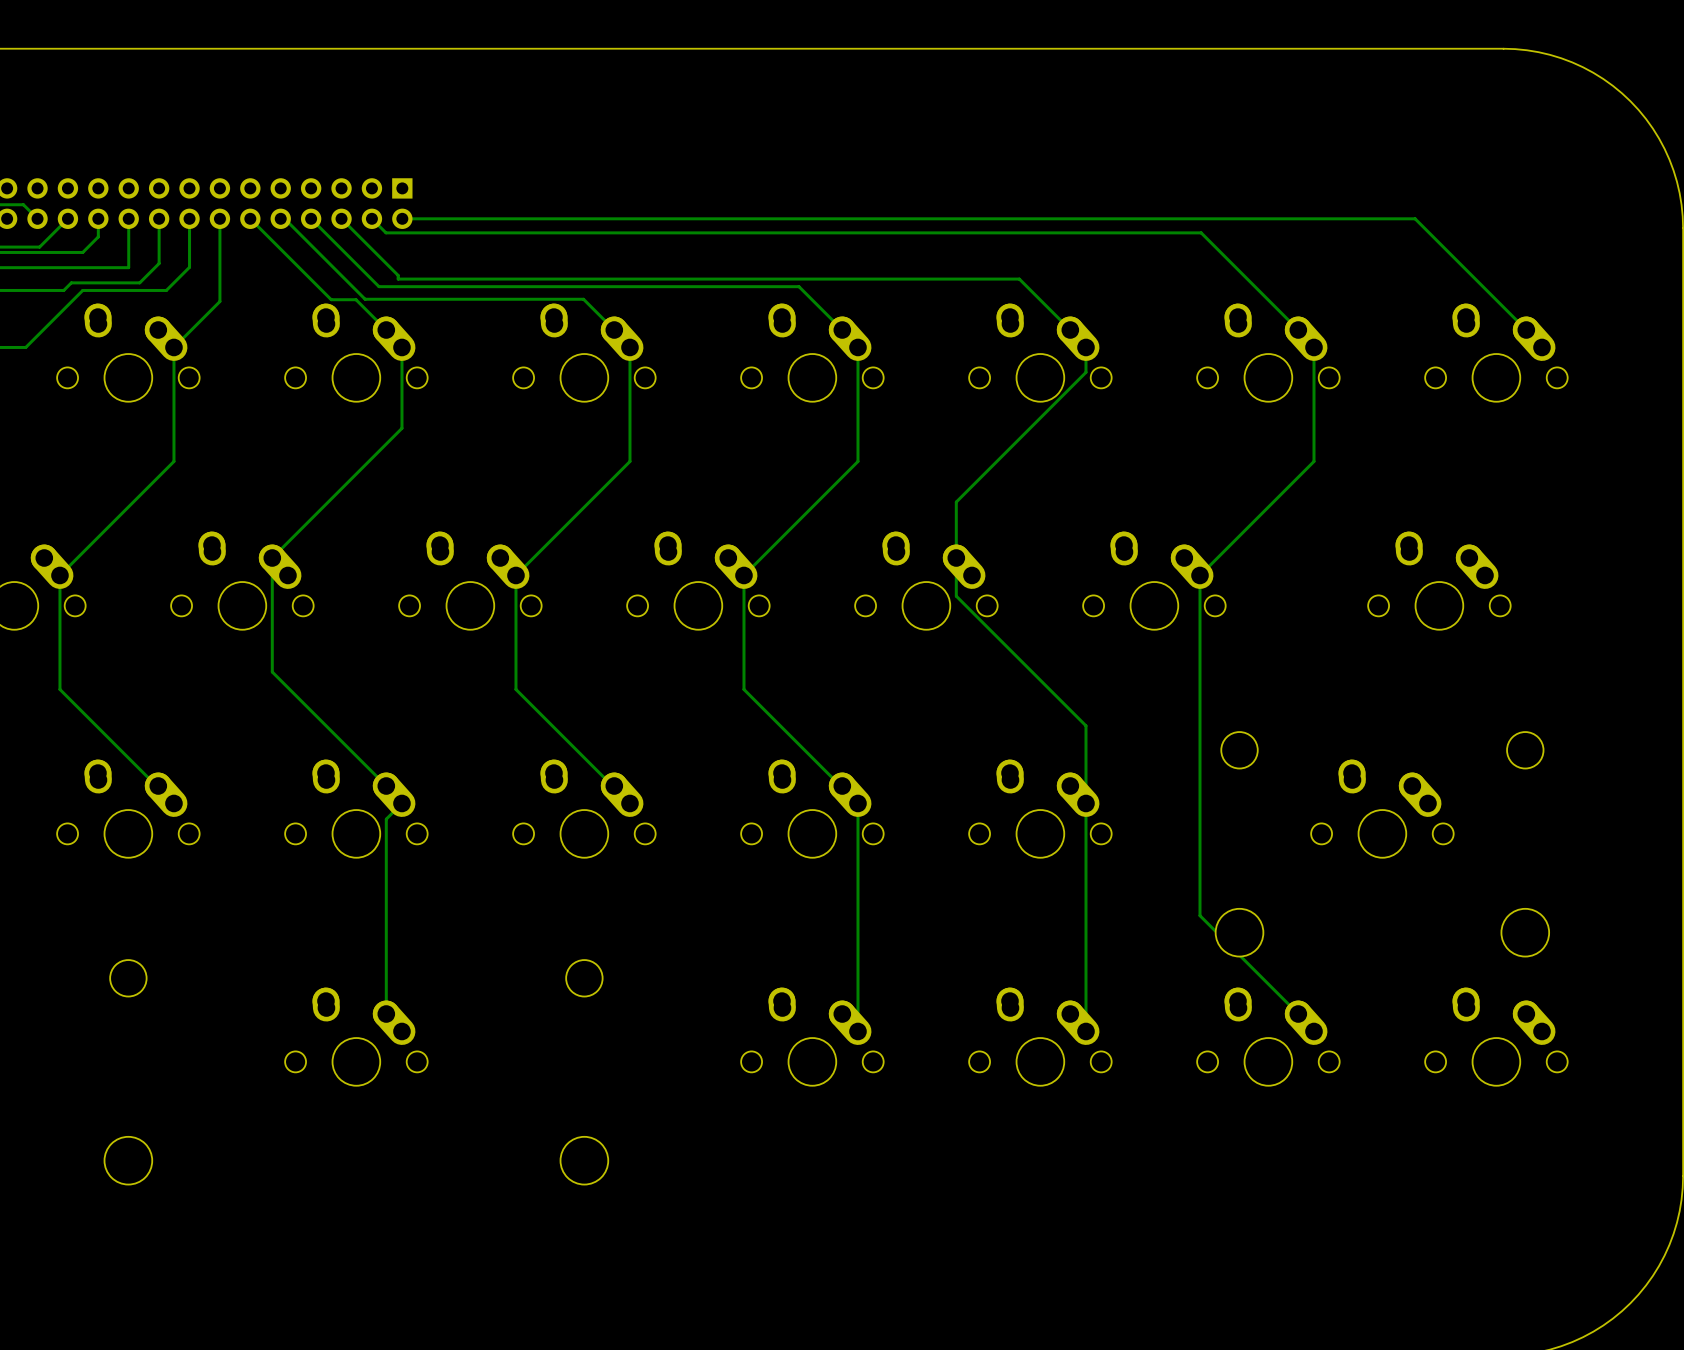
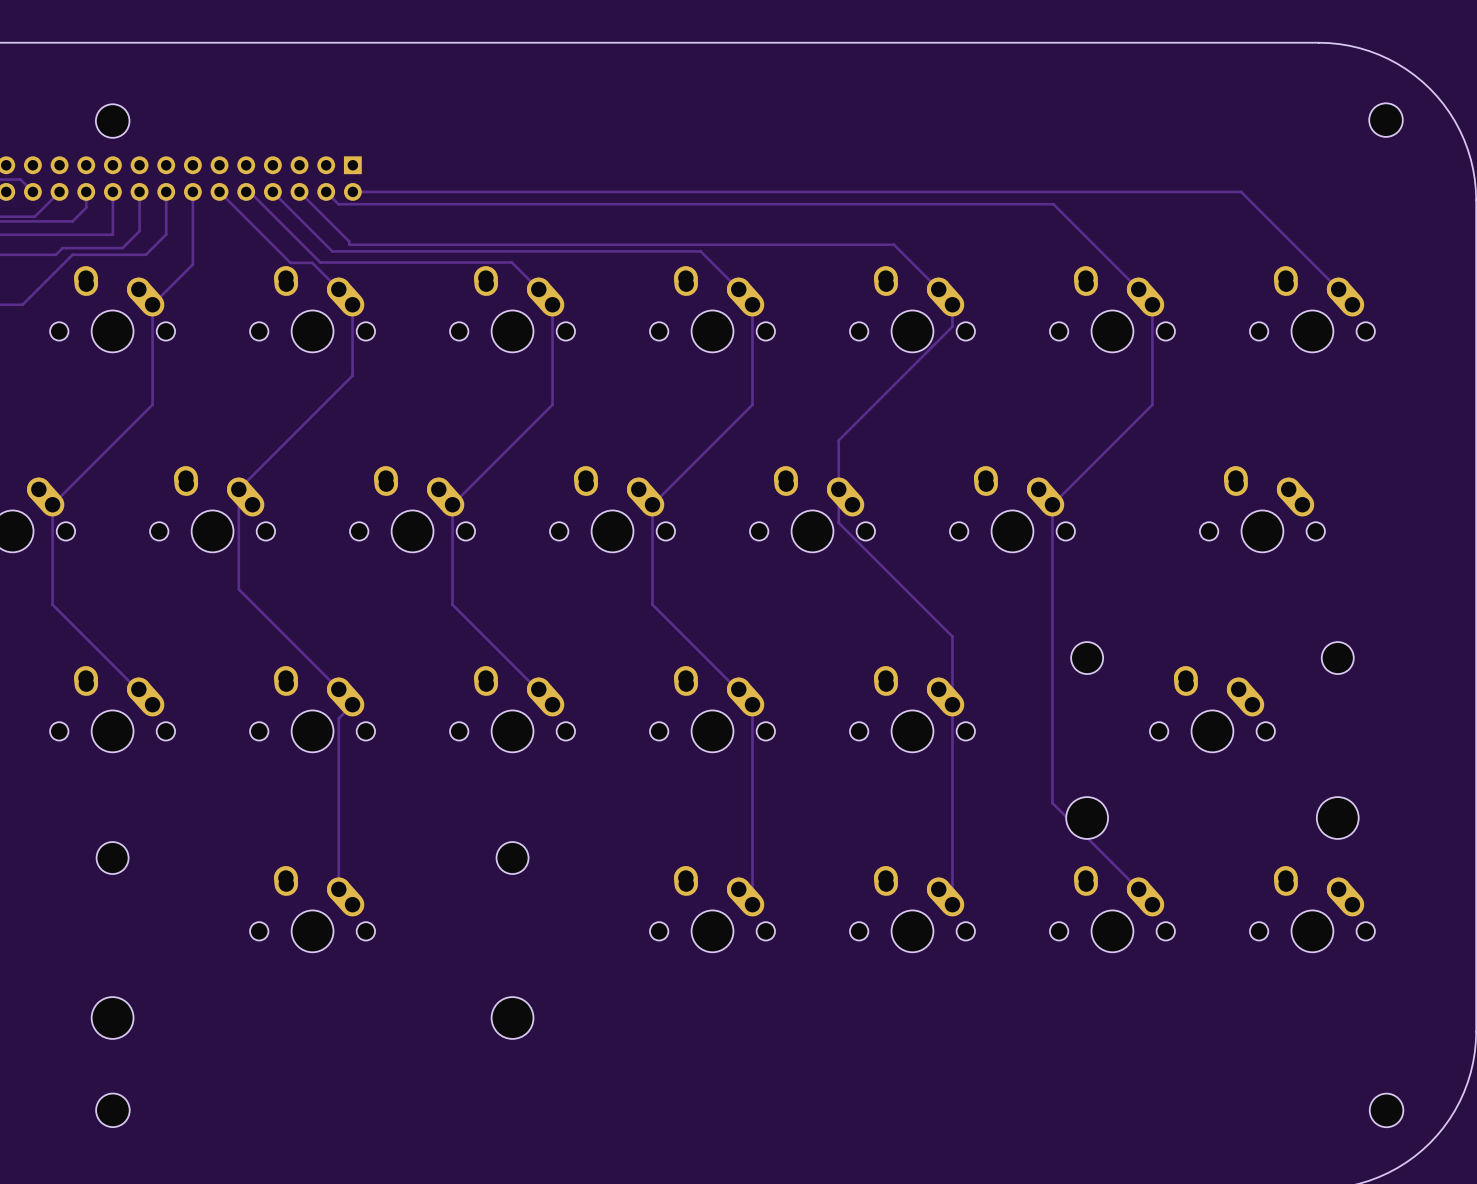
part: none -> (1386, 120)
part: none -> (112, 121)
part: none -> (112, 1110)
part: none -> (1386, 1110)

